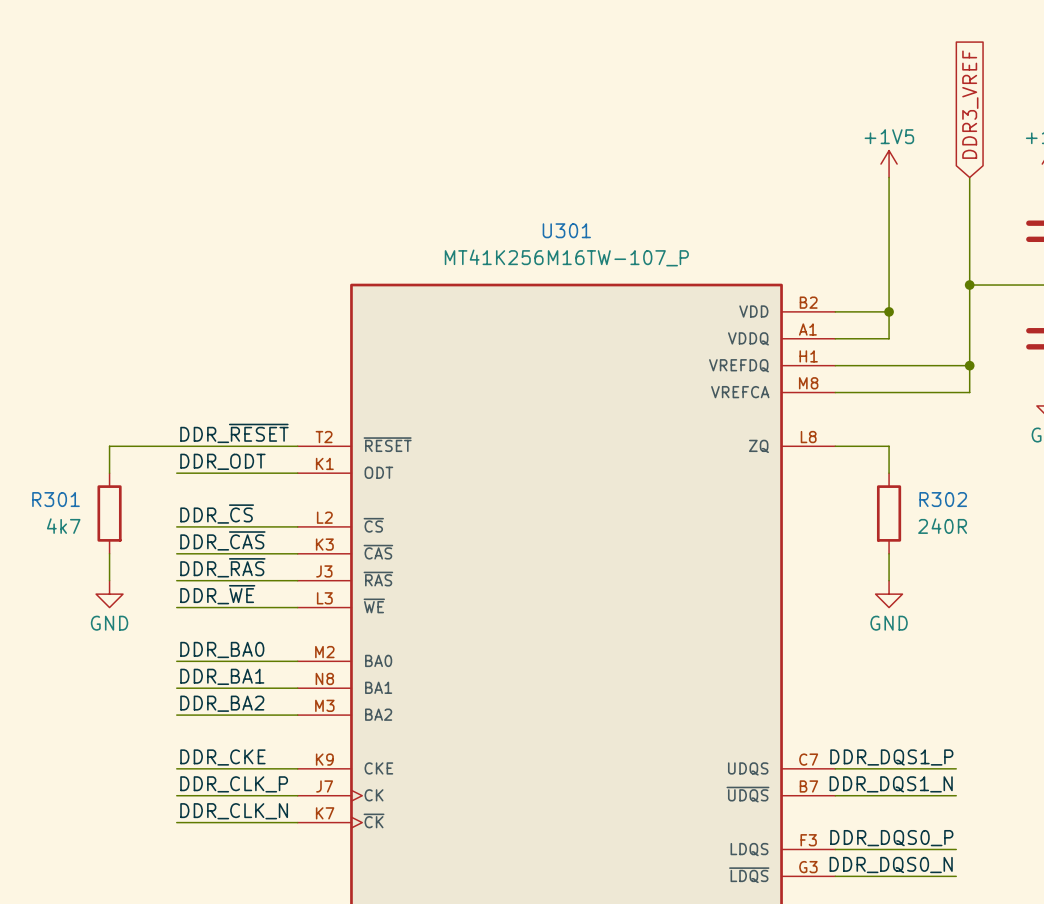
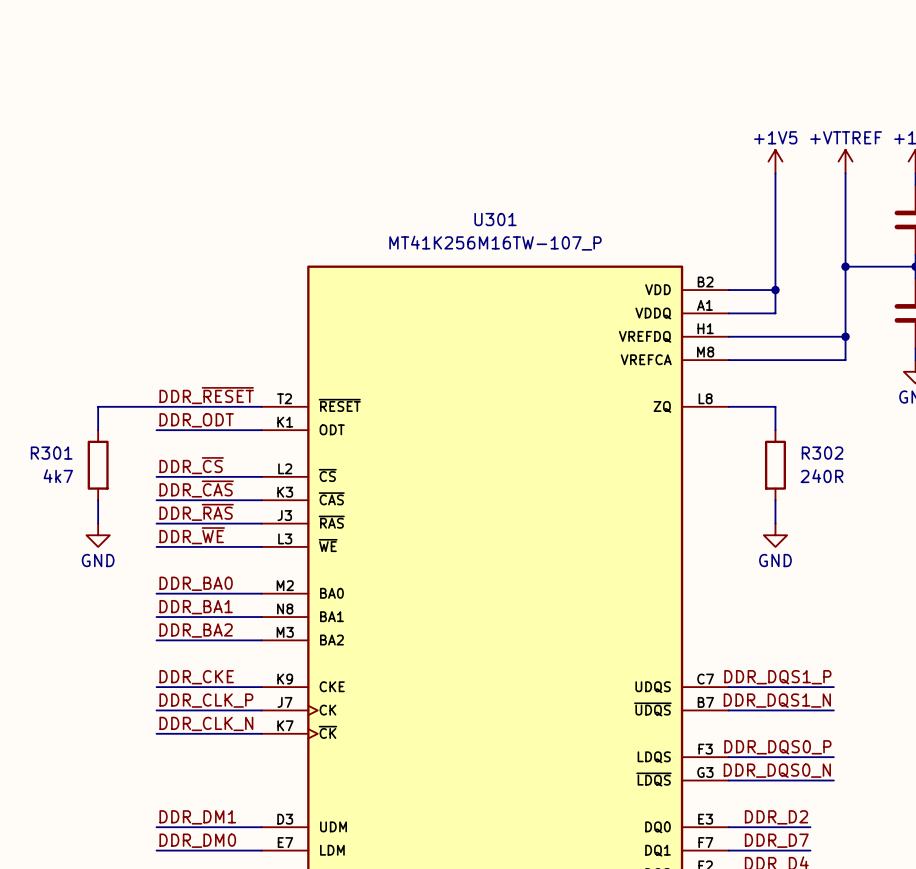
global label: DDR3_VREF (970, 104) -> none
power symbol: none -> +VTTREF (845, 161)

